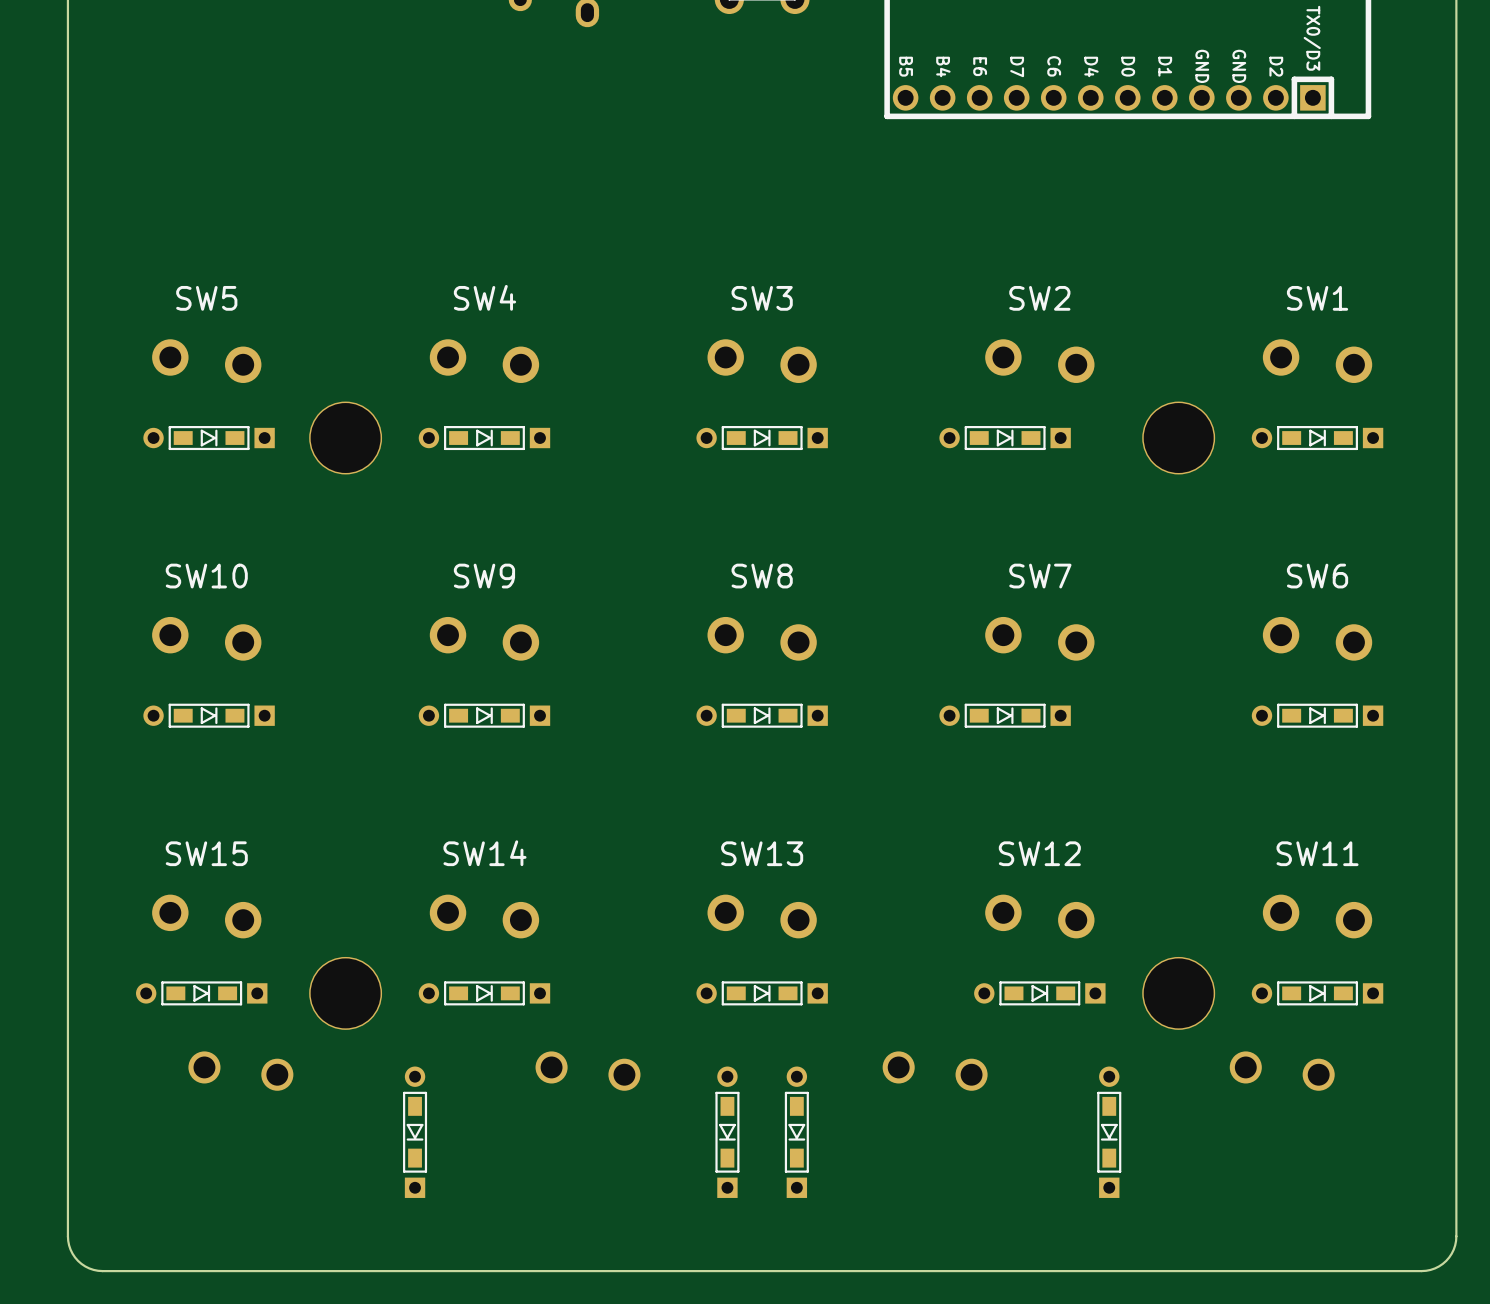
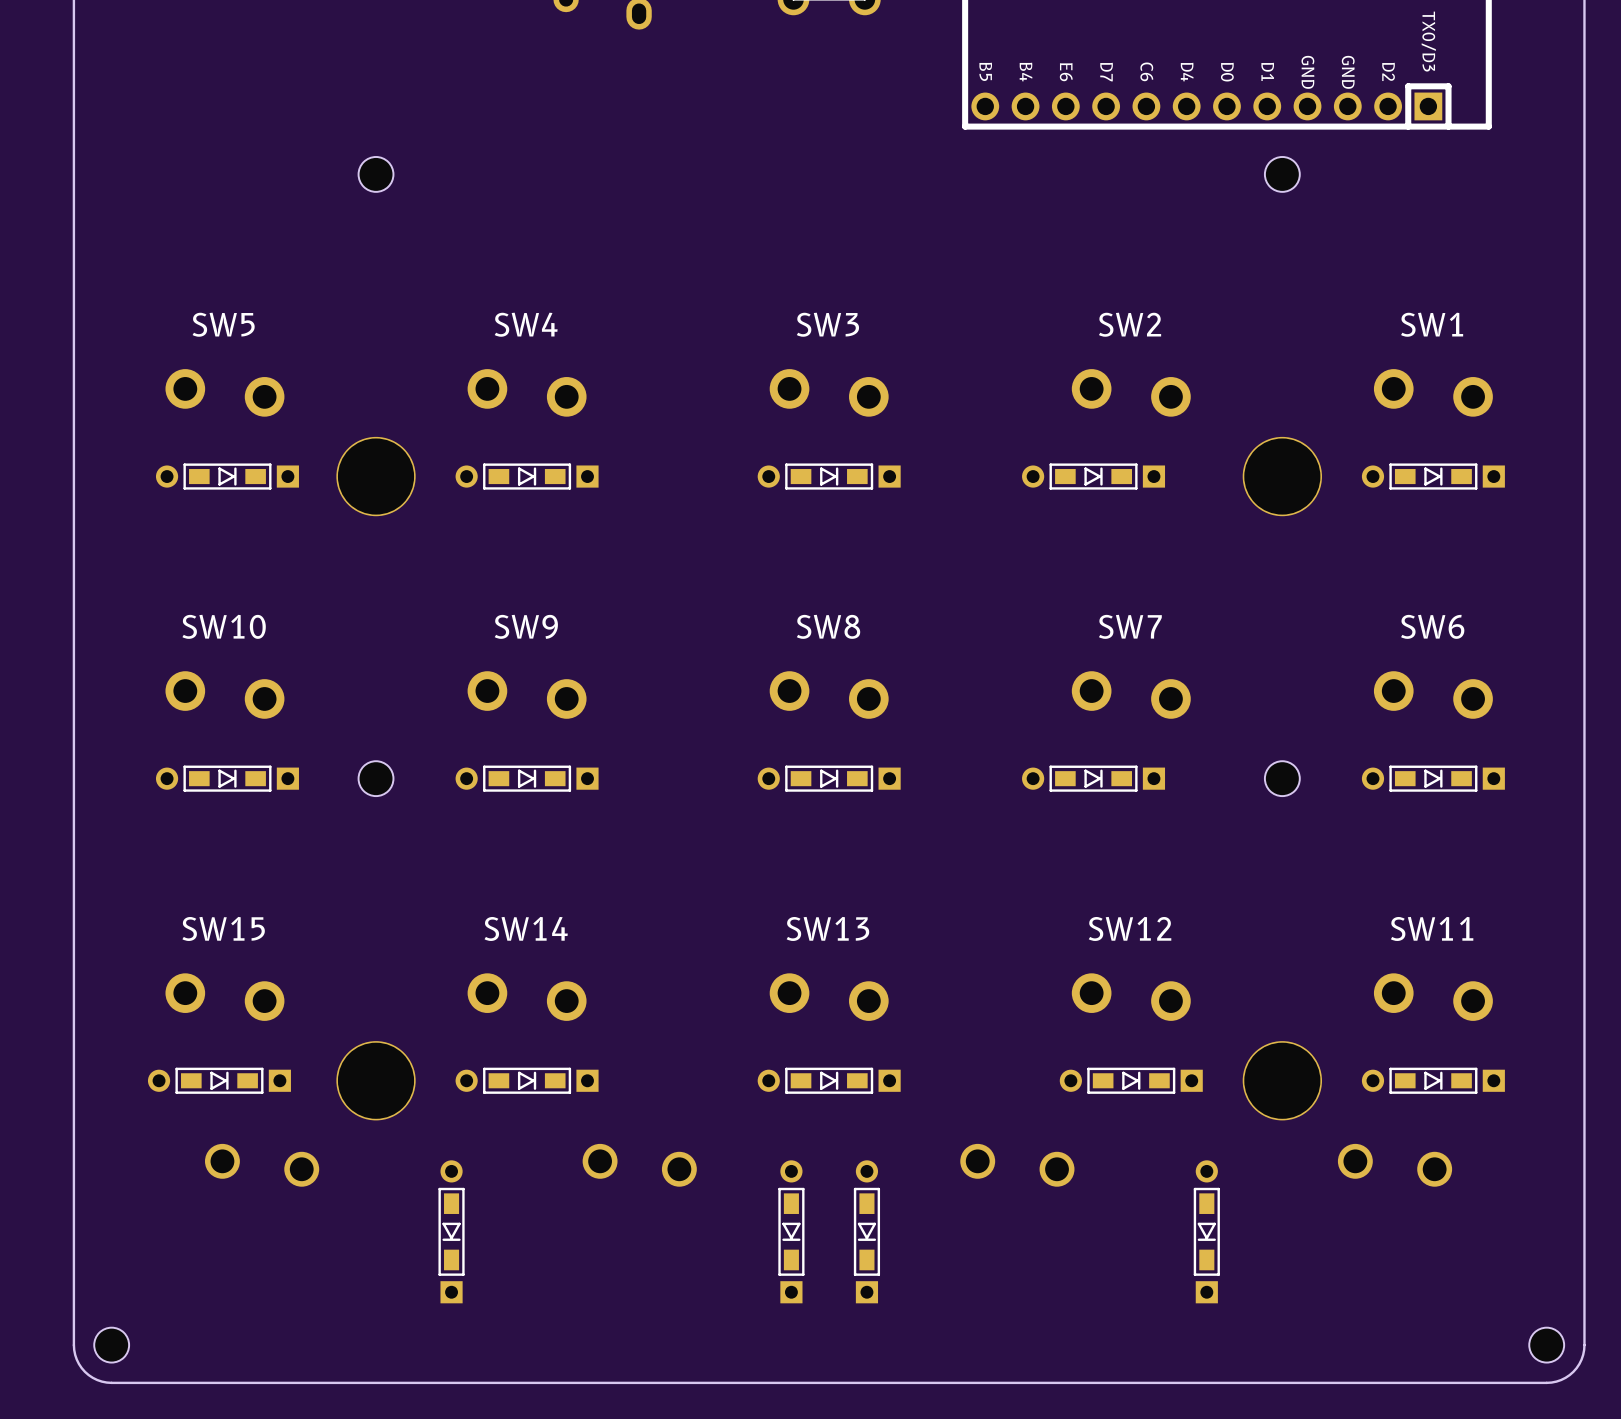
part: none -> (376, 174)
part: none -> (1282, 174)
part: none -> (376, 778)
part: none -> (1282, 778)
part: none -> (111, 1345)
part: none -> (1546, 1345)

